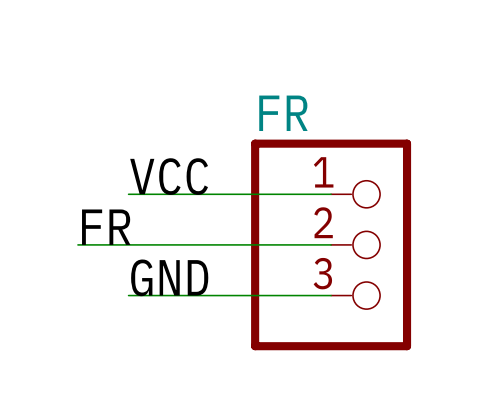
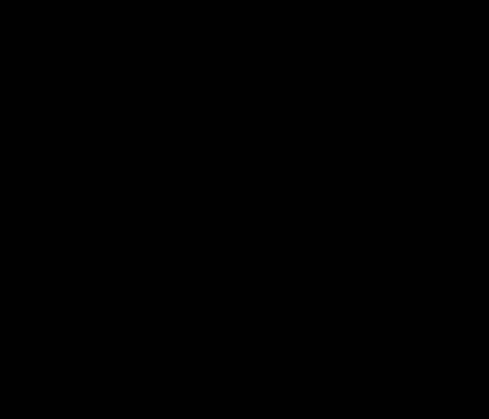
label: VCC (169, 176) -> none
wire: (128, 194) (331, 194) -> none
label: FR (106, 227) -> none
wire: (77, 244) (331, 244) -> none
FR: (331, 244) -> none
label: GND (169, 277) -> none
wire: (128, 295) (331, 295) -> none

